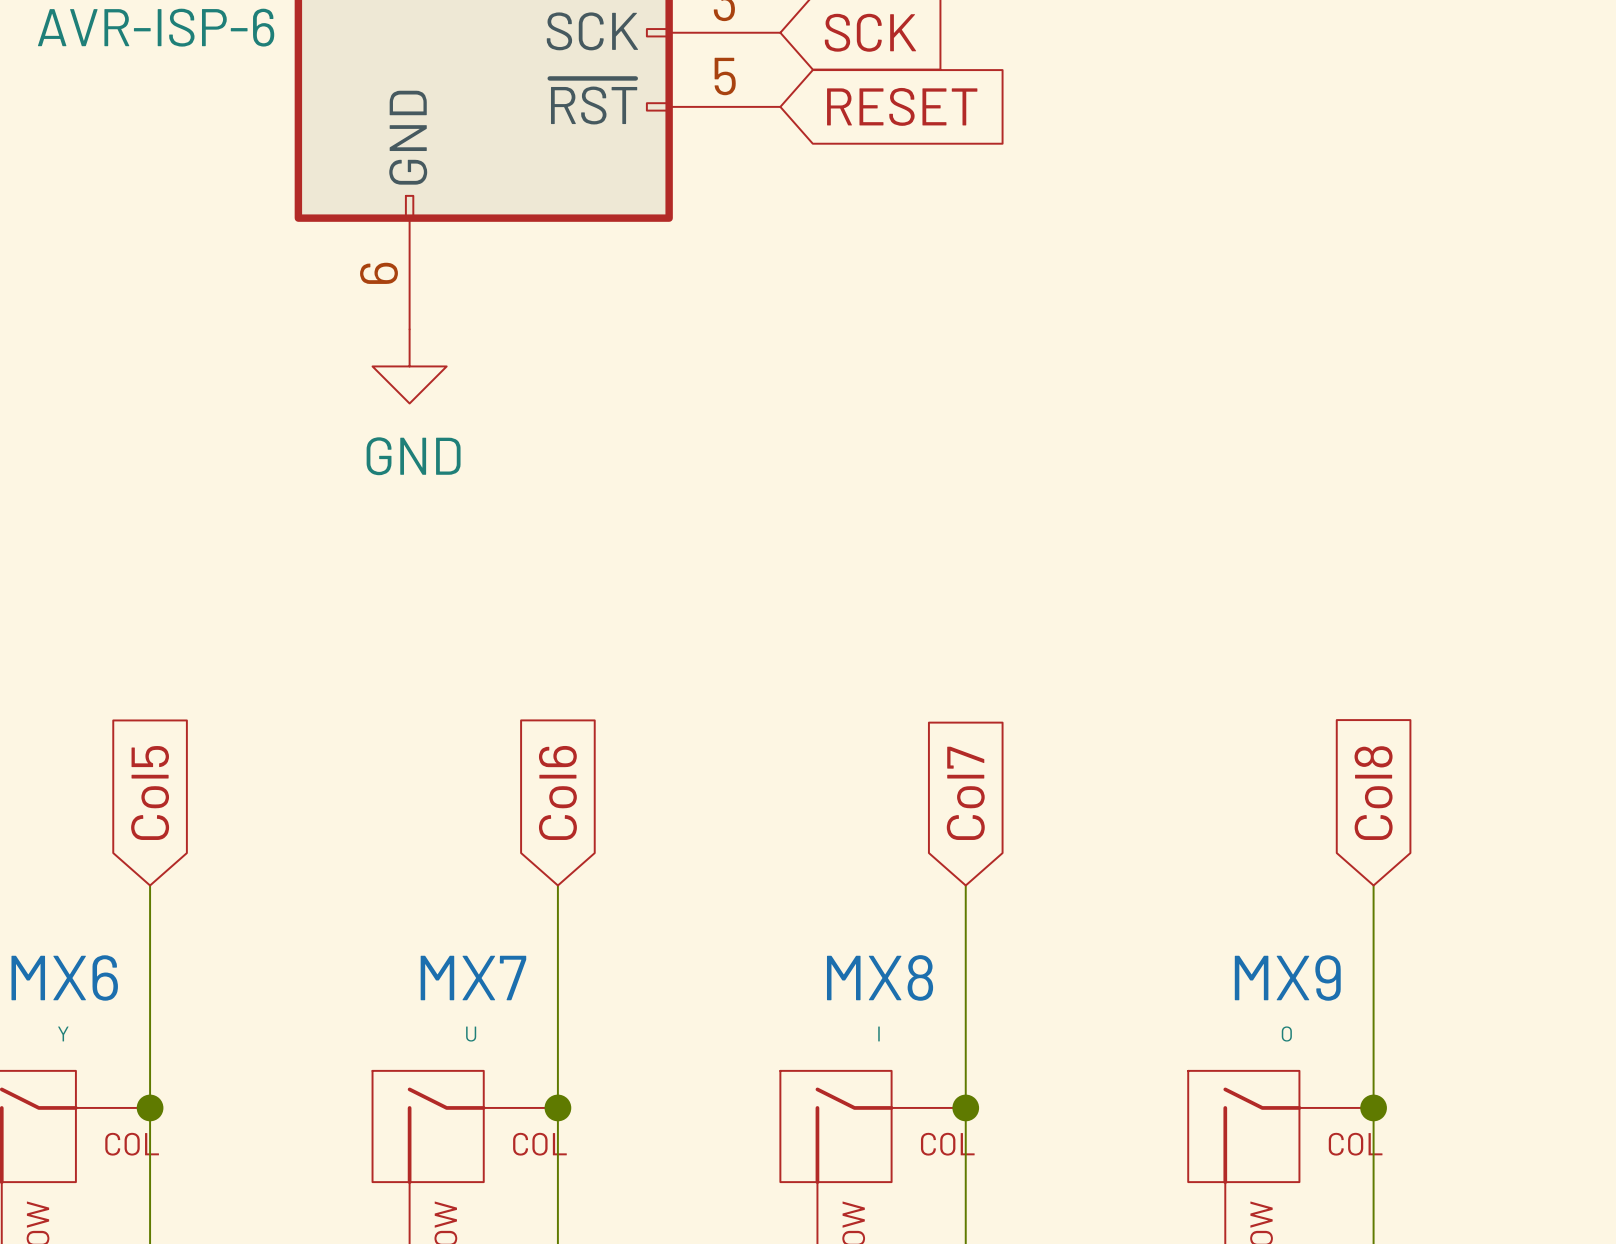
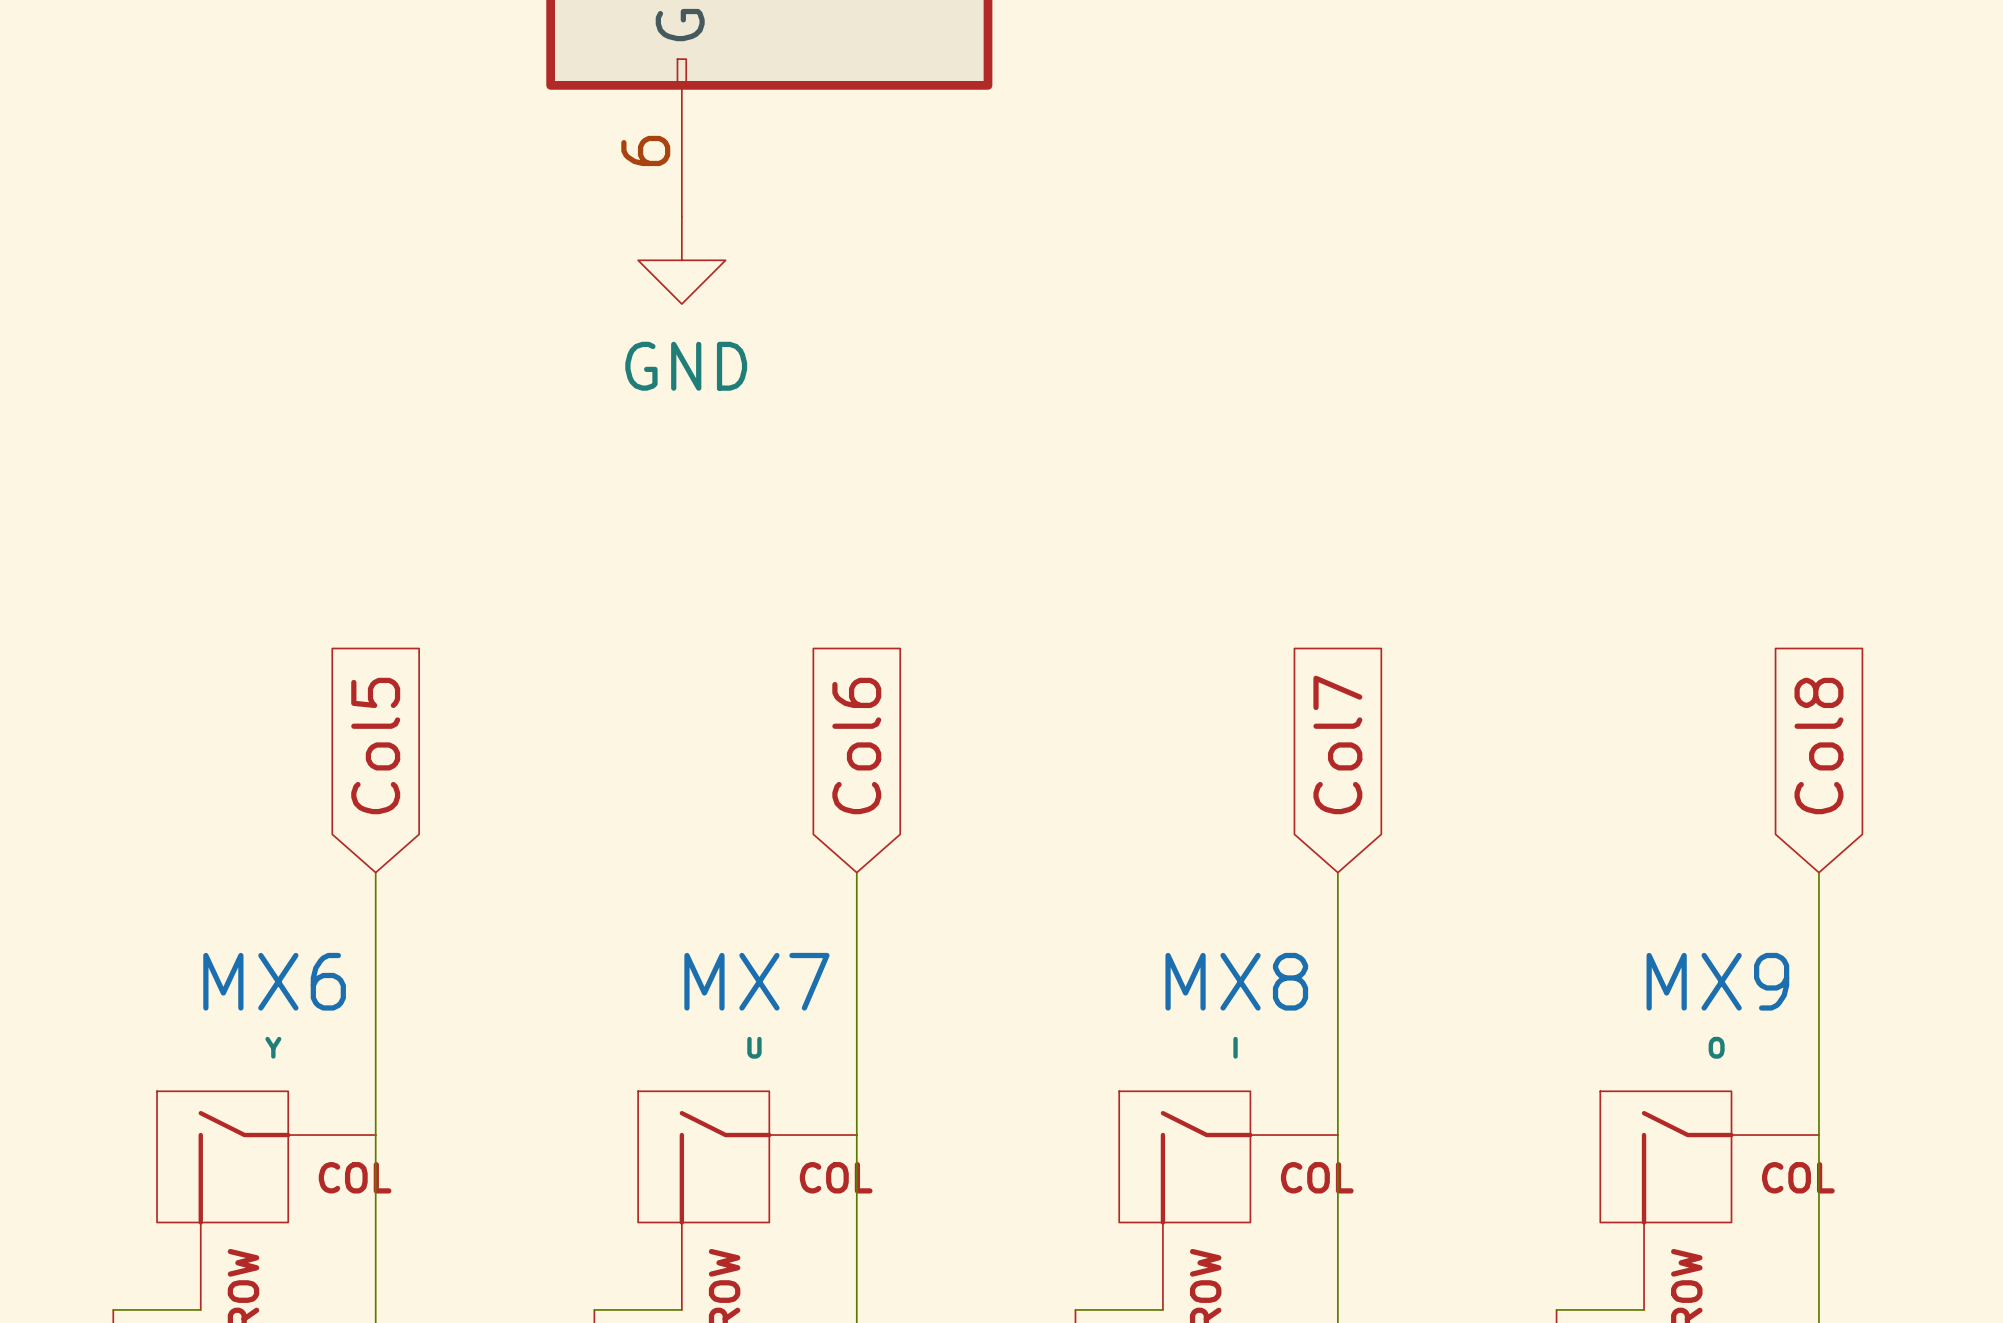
junction: (150, 1107) -> none
junction: (557, 1107) -> none
junction: (965, 1107) -> none
junction: (1373, 1107) -> none

